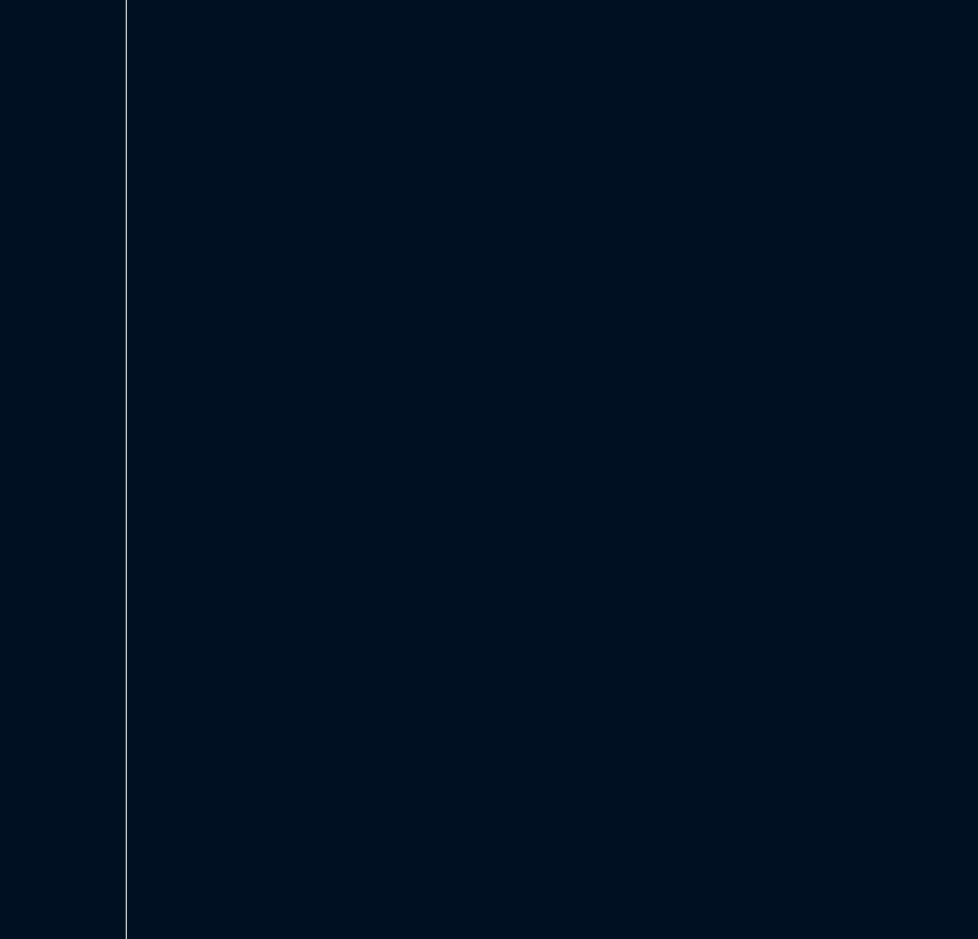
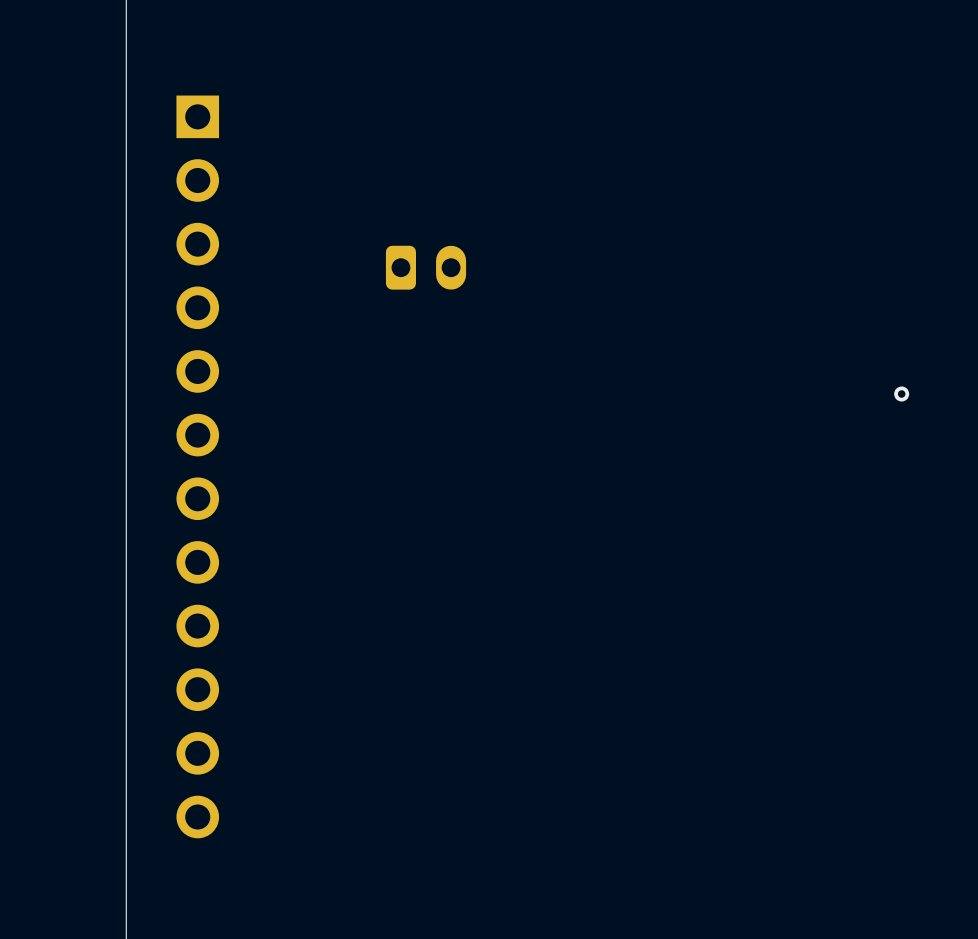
part: none -> (426, 267)
via: none -> (901, 394)
part: none -> (197, 466)

